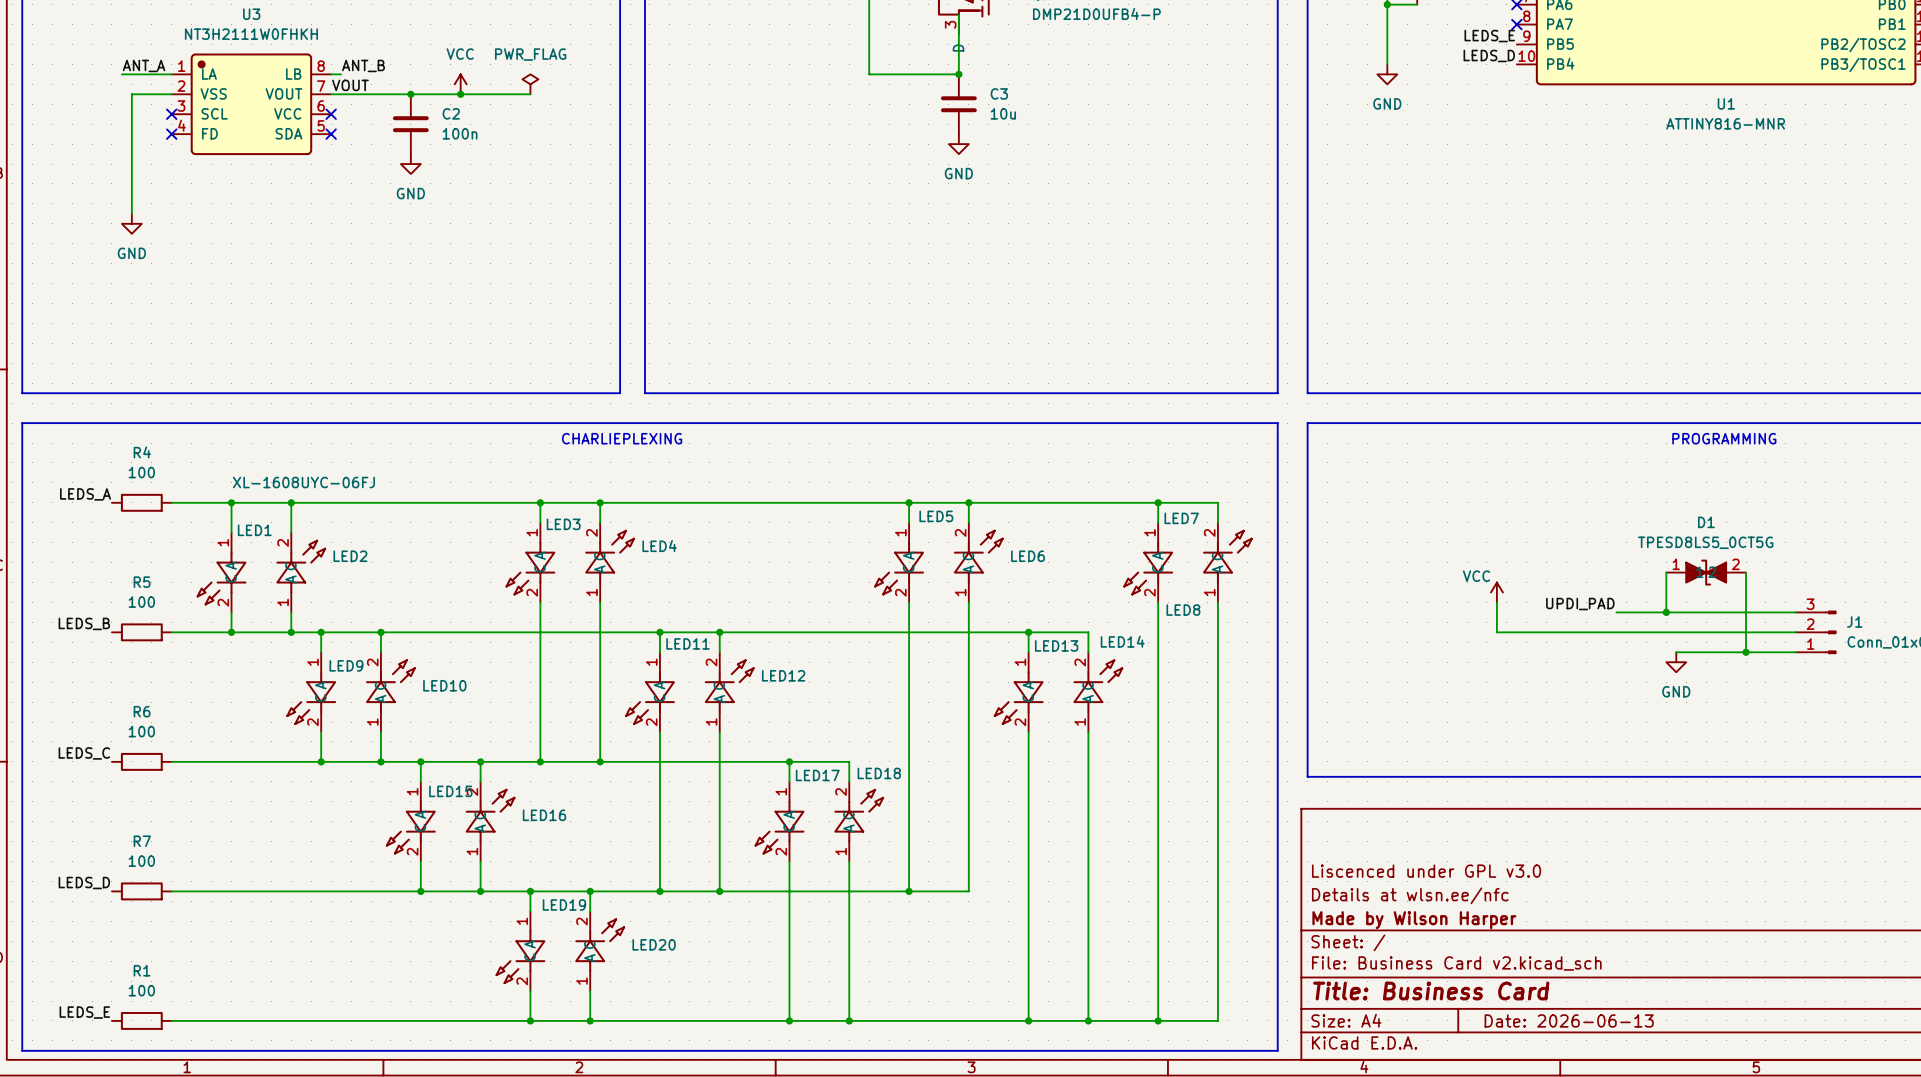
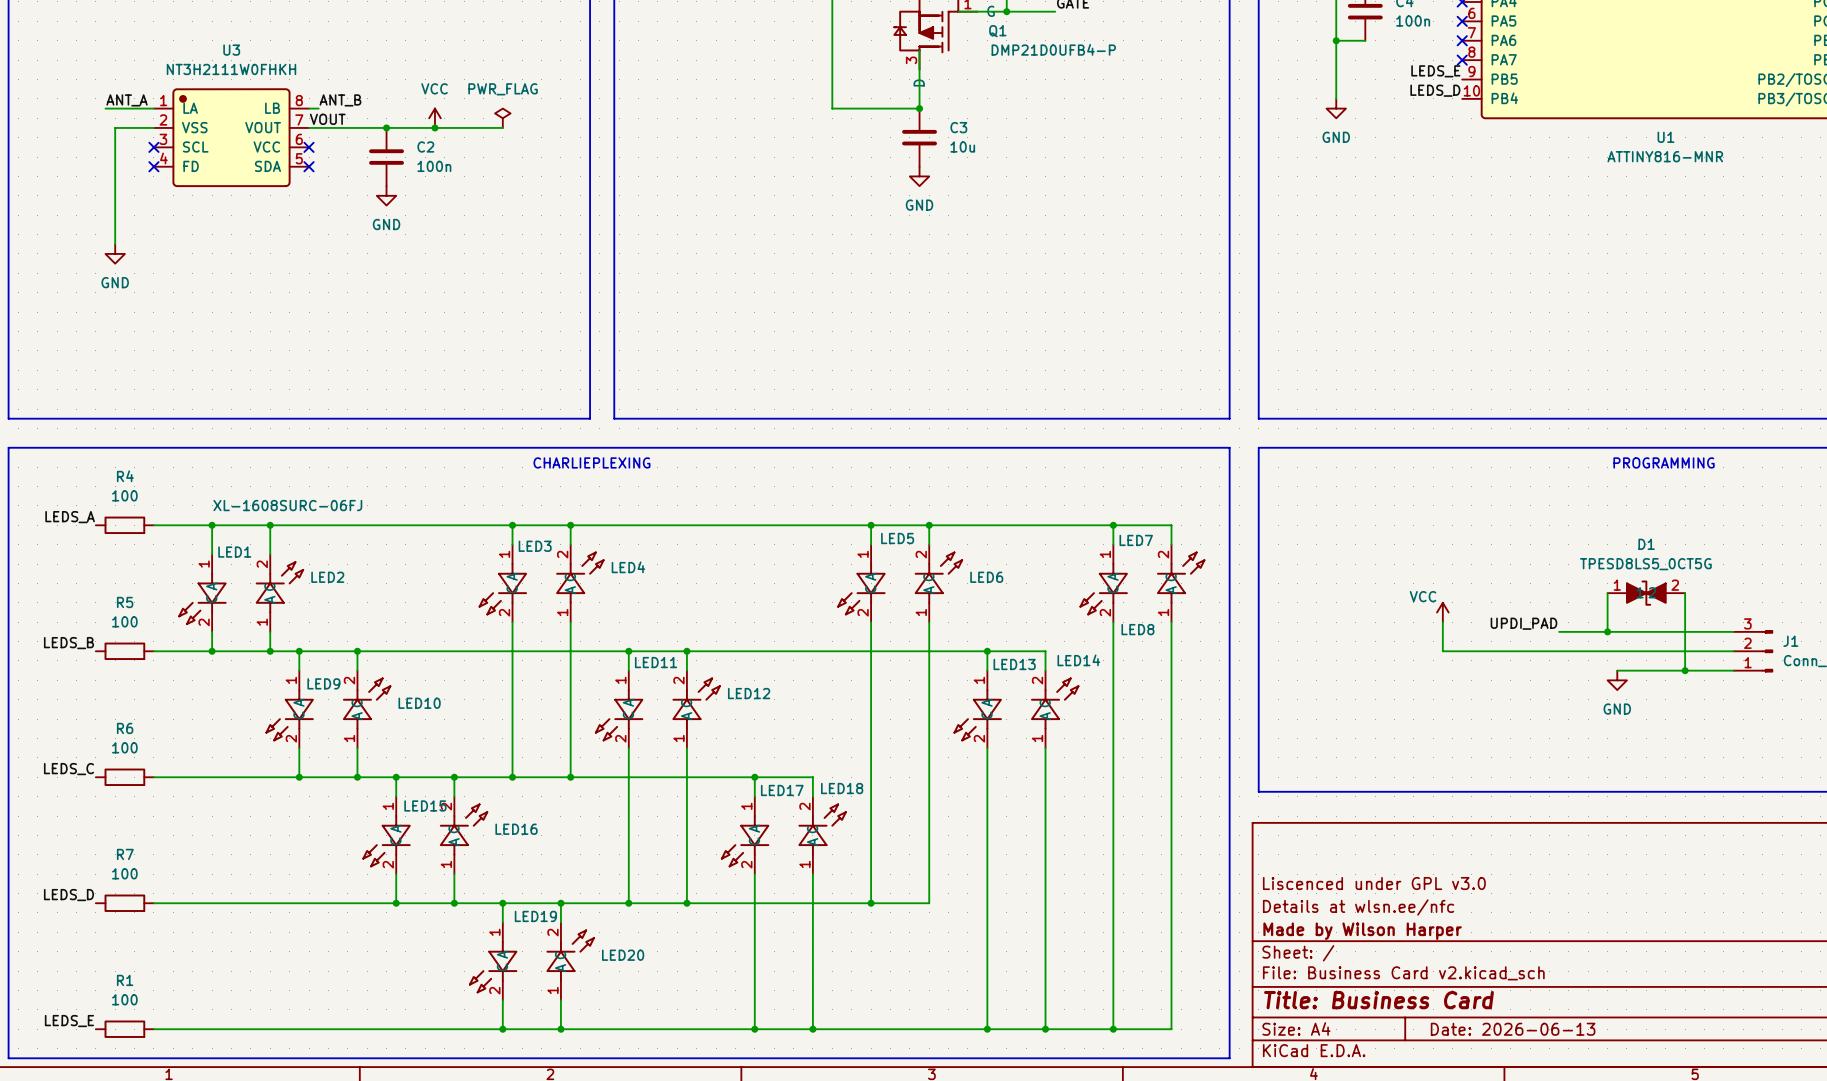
LED1 value: XL-1608UYC-06FJ (303, 482) -> XL-1608SURC-06FJ (287, 505)

